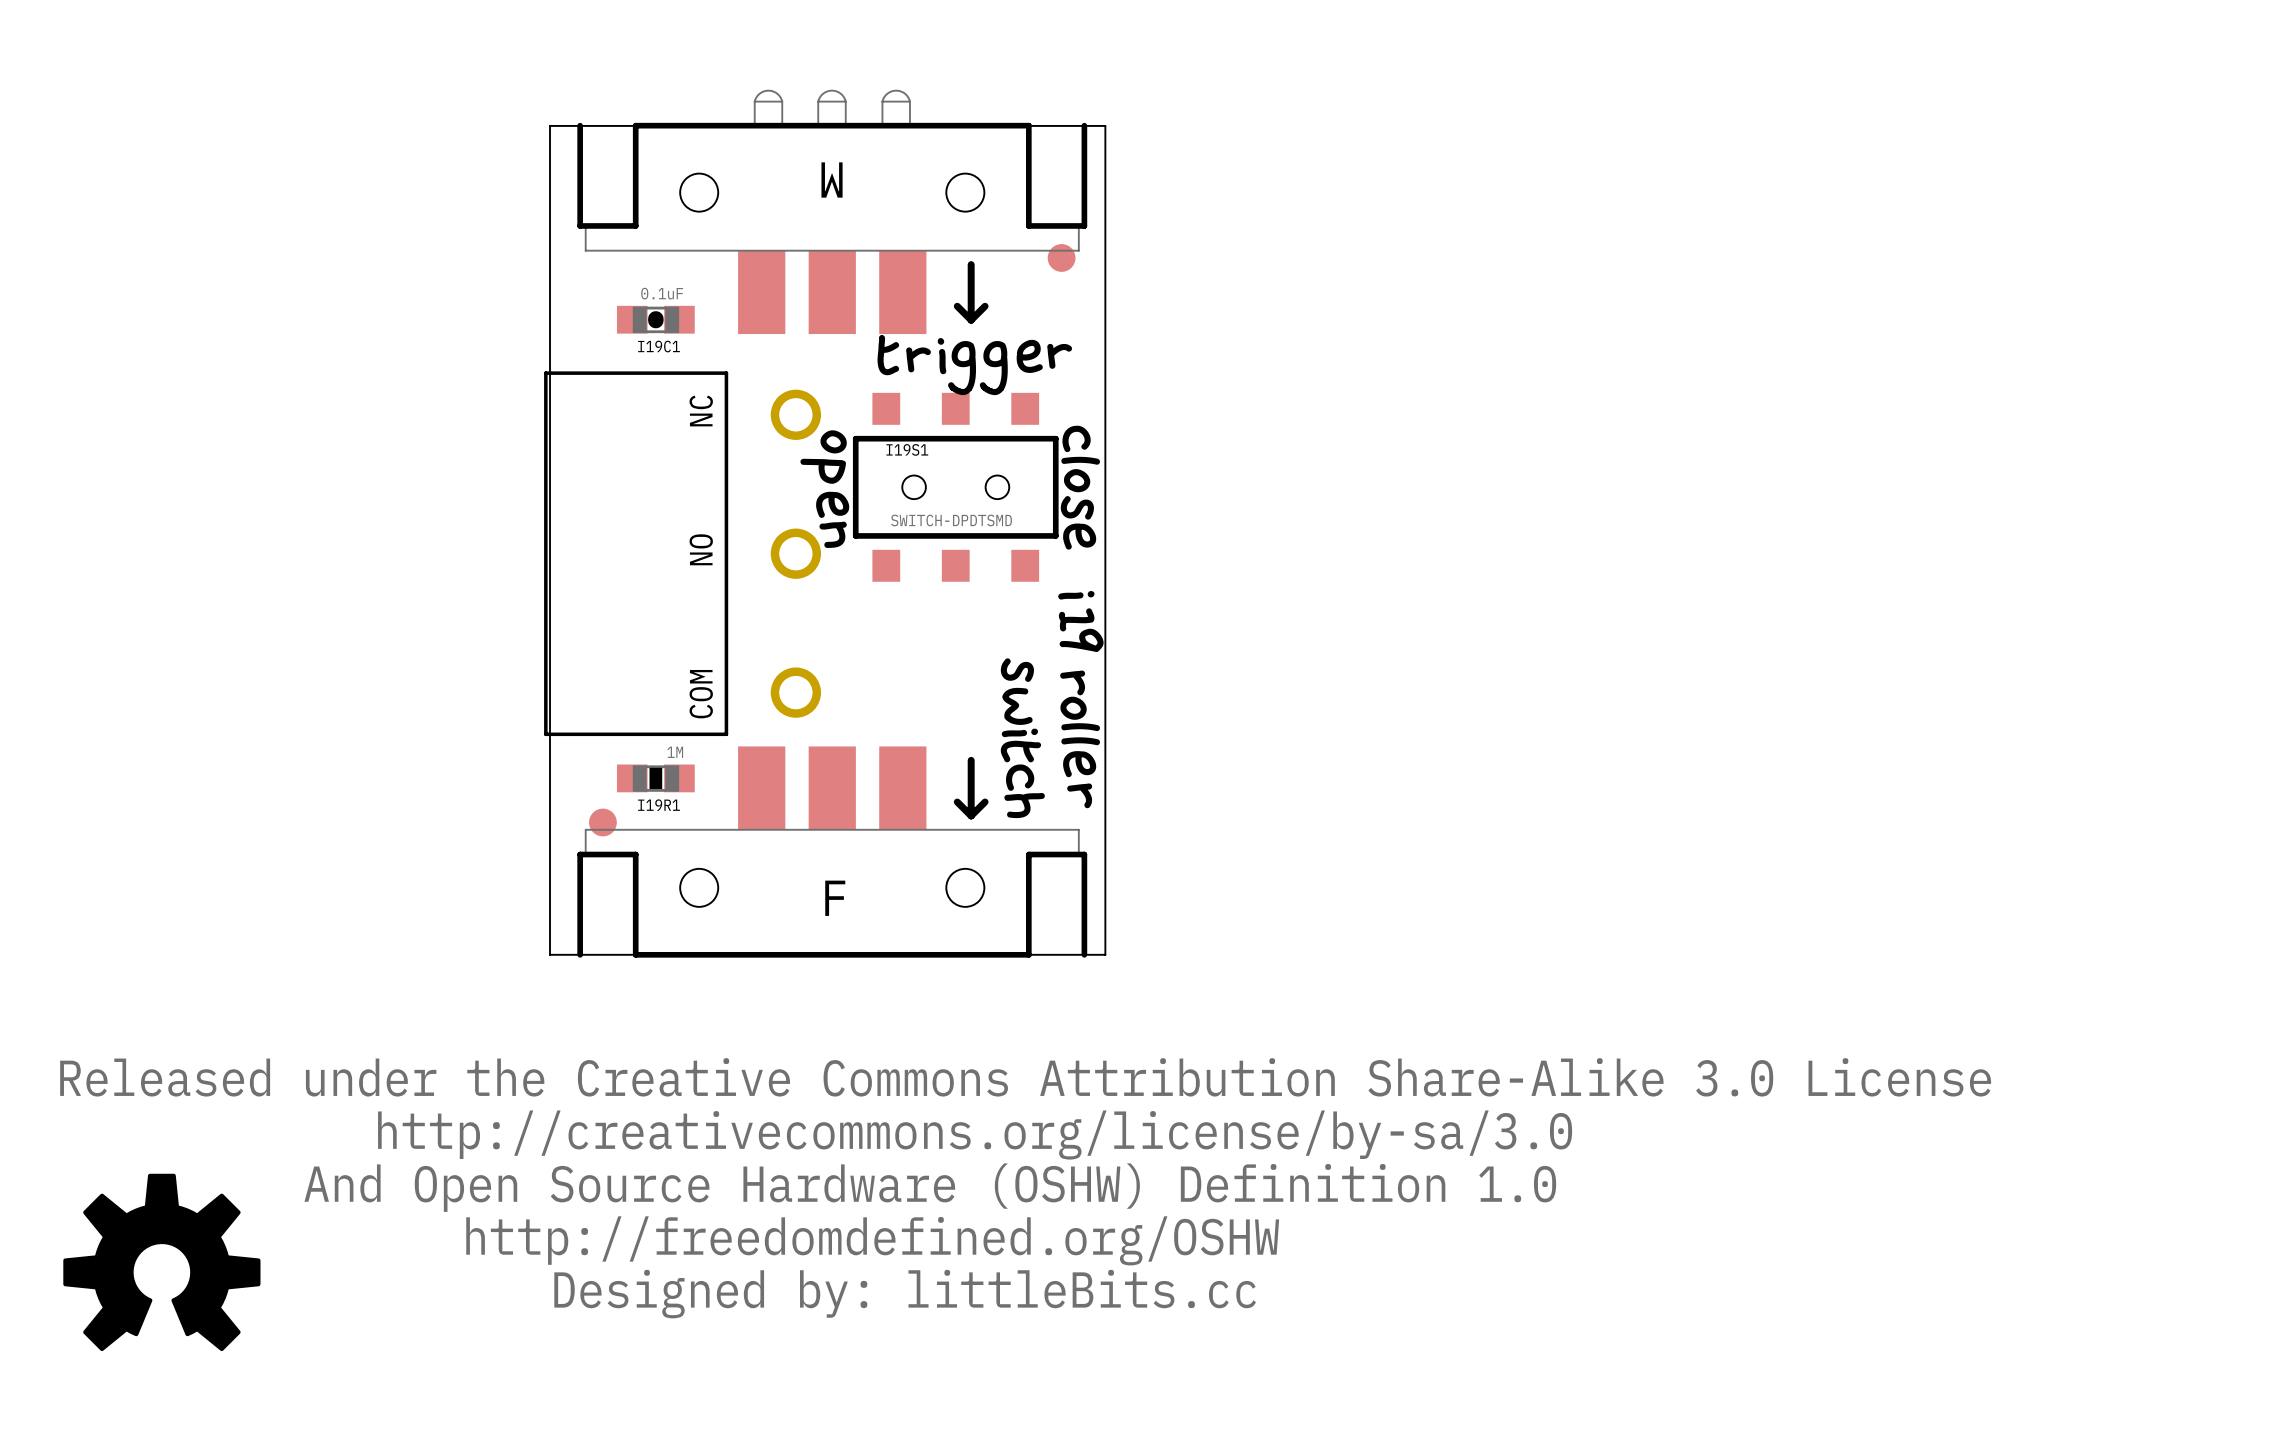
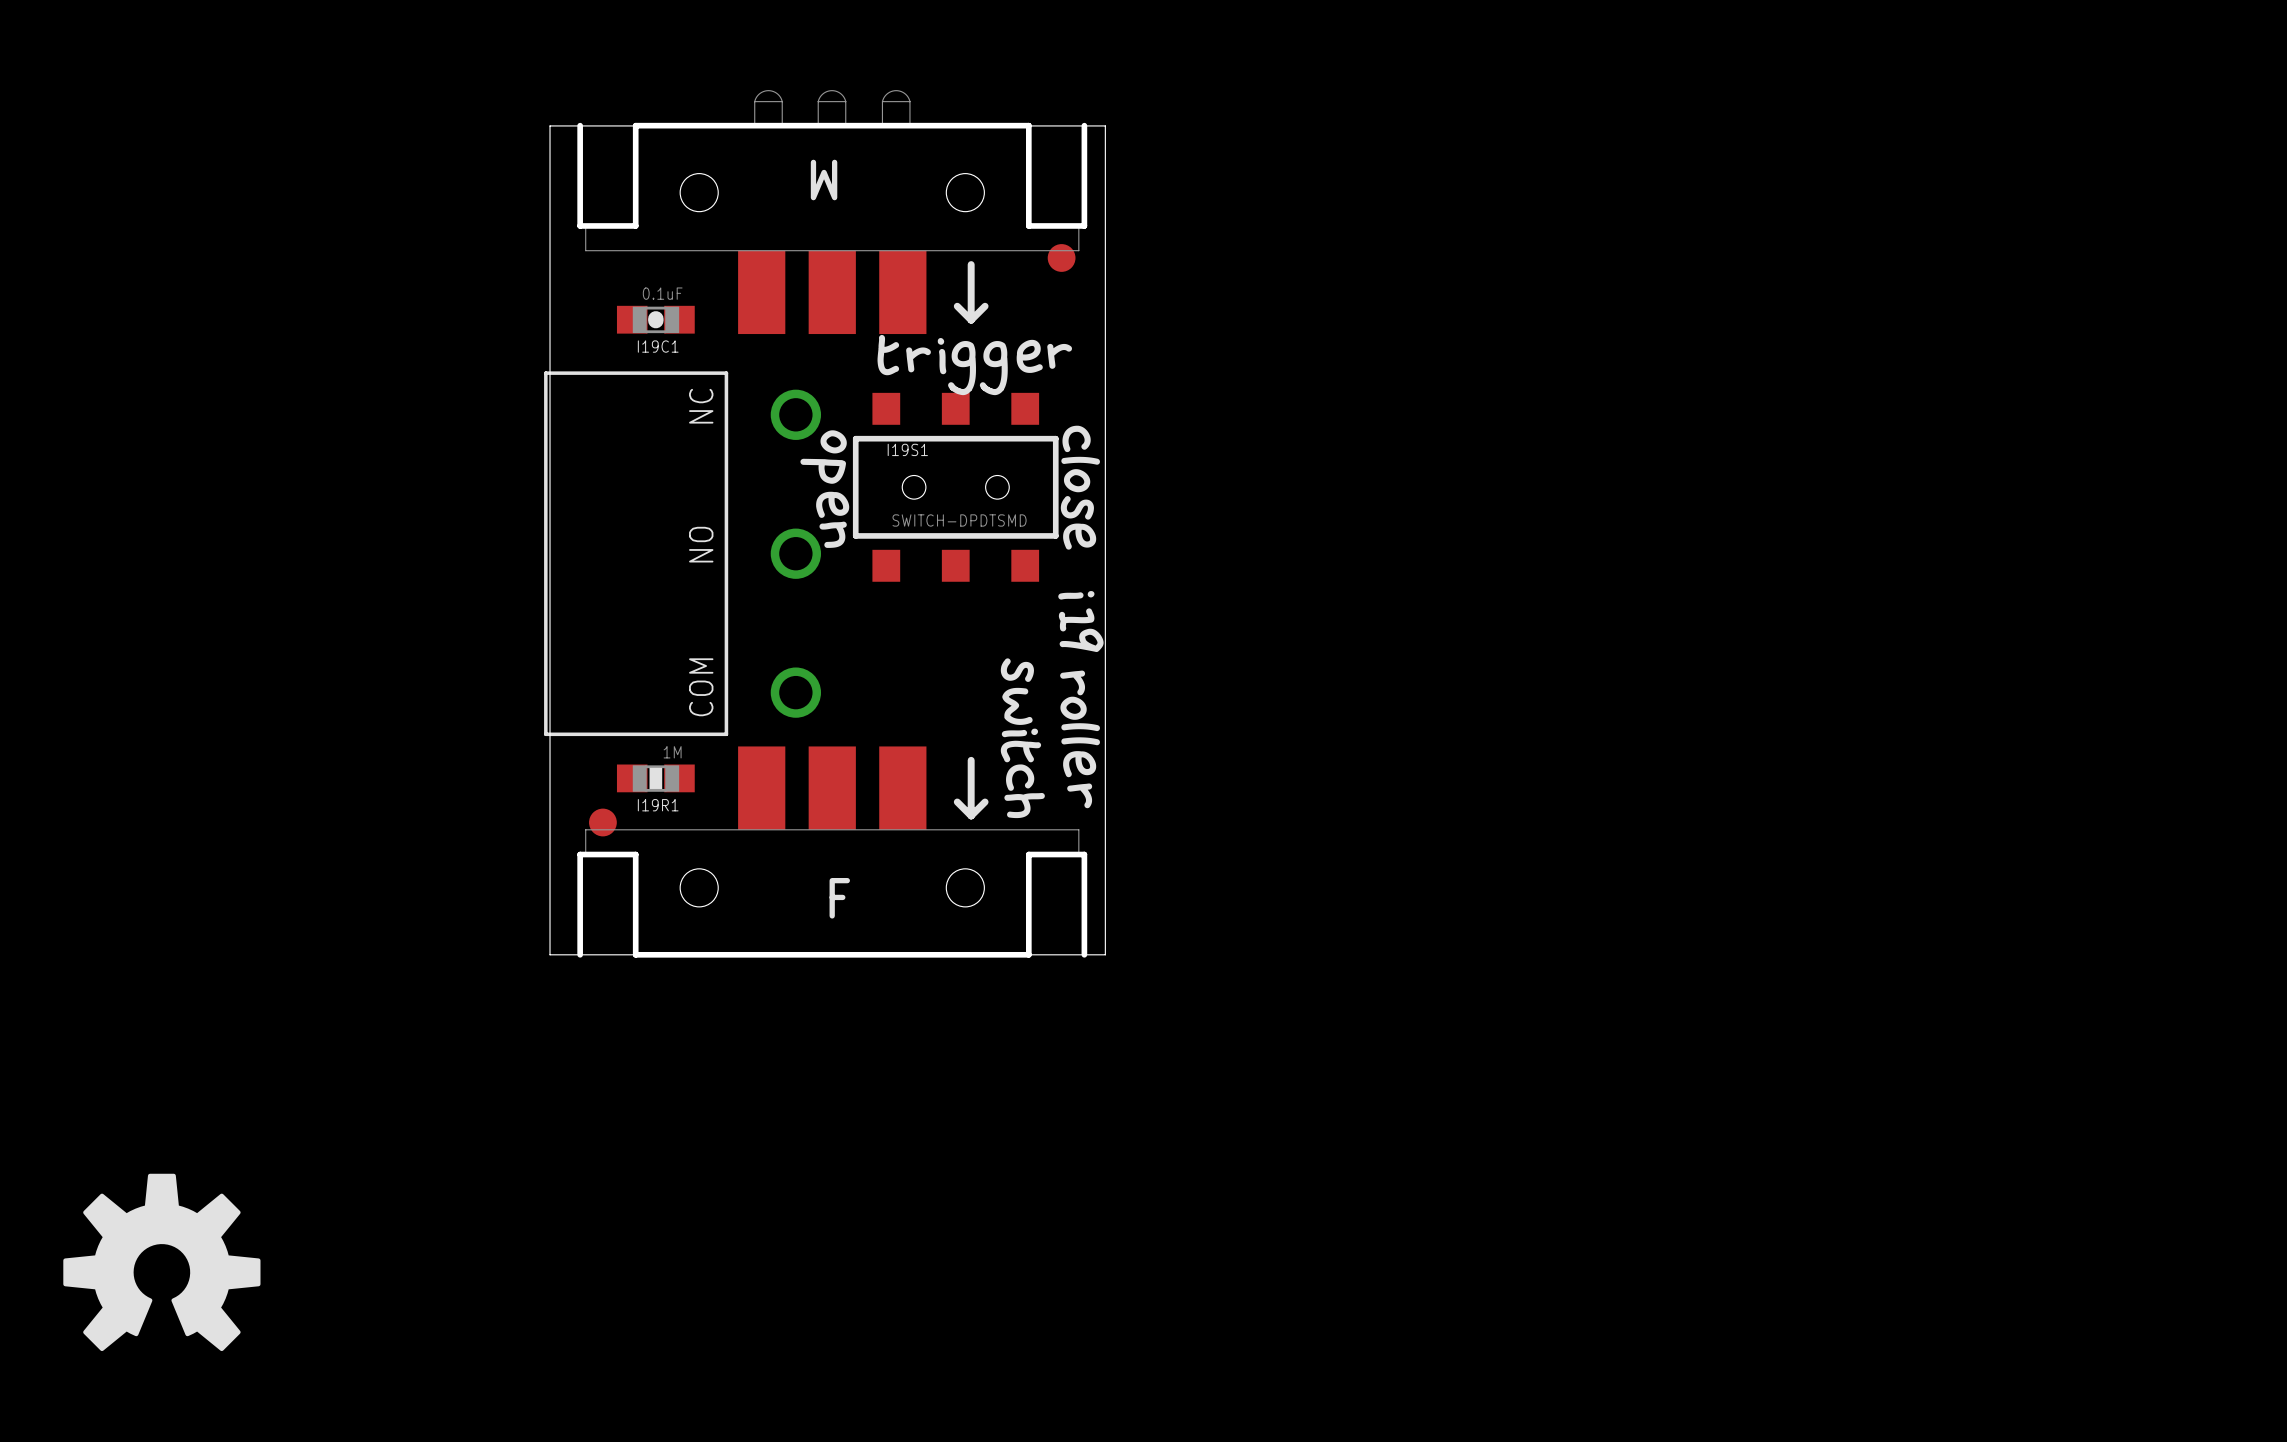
drawing: [60, 1058, 1992, 1319] -> none

